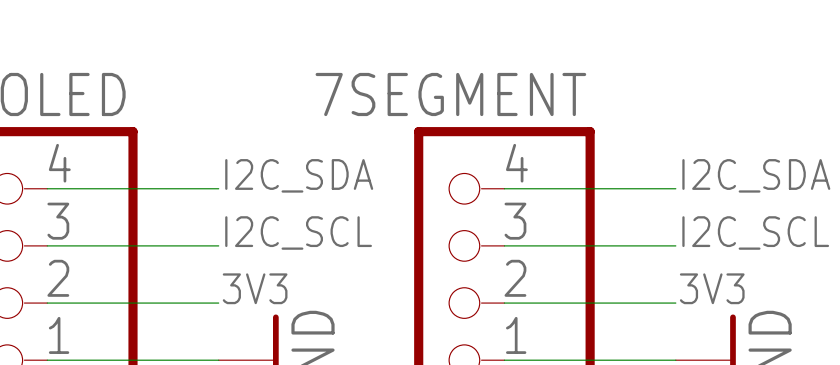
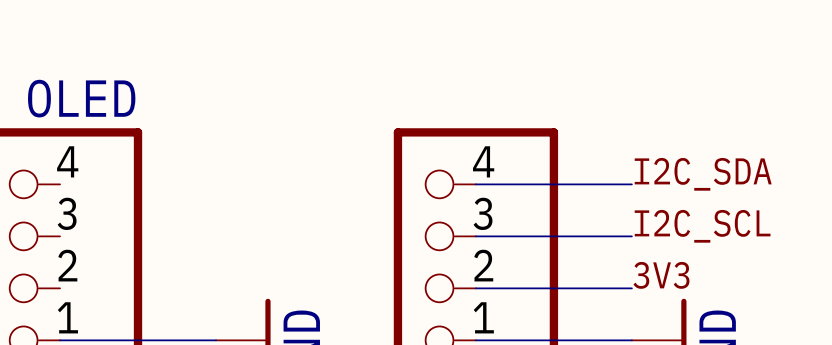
part value: 7SEGMENT (450, 94) -> none
label: I2C_SDA (299, 175) -> none
wire: (47, 188) (218, 188) -> none
label: I2C_SCL (298, 232) -> none
wire: (47, 245) (218, 245) -> none
label: 3V3 (255, 288) -> none
wire: (47, 303) (218, 303) -> none

